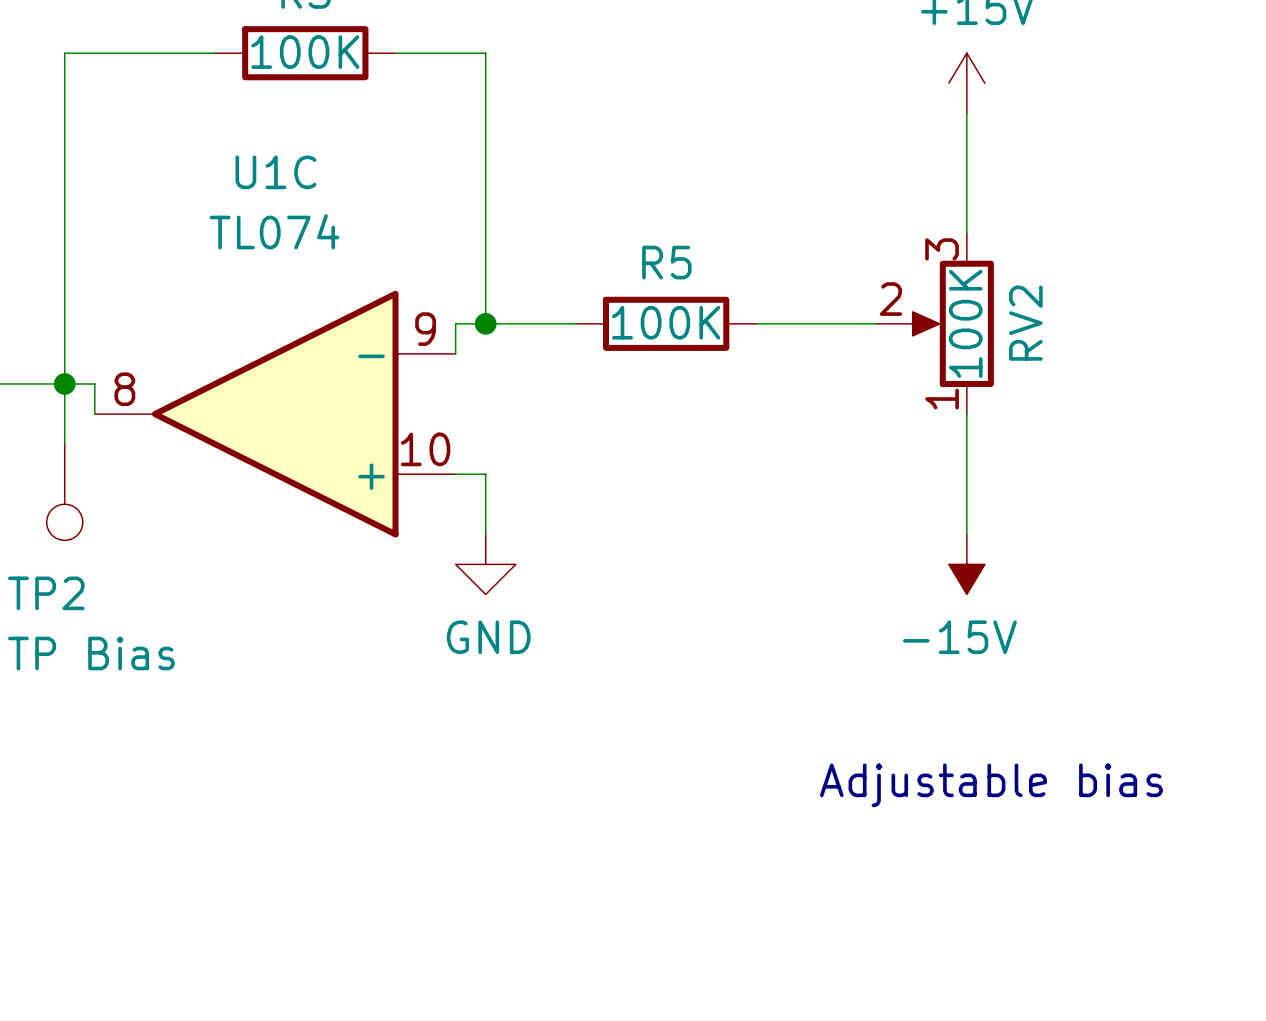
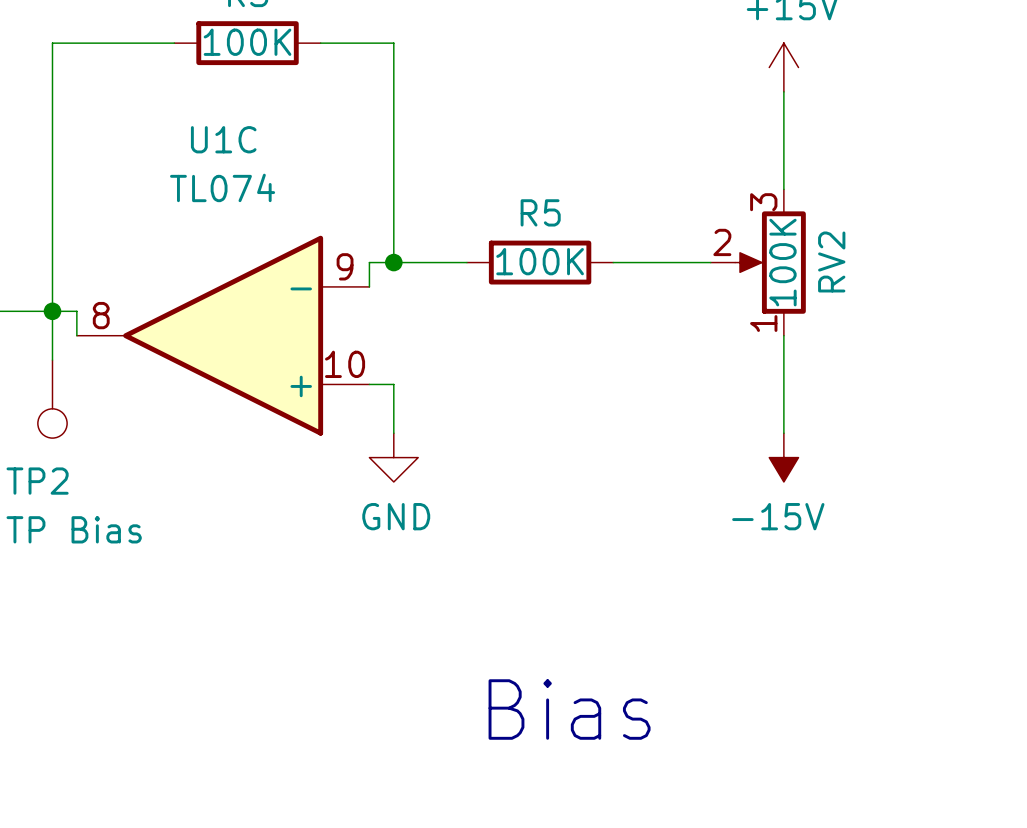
text: Adjustable bias (991, 785) -> none
text: none -> Bias (569, 709)

